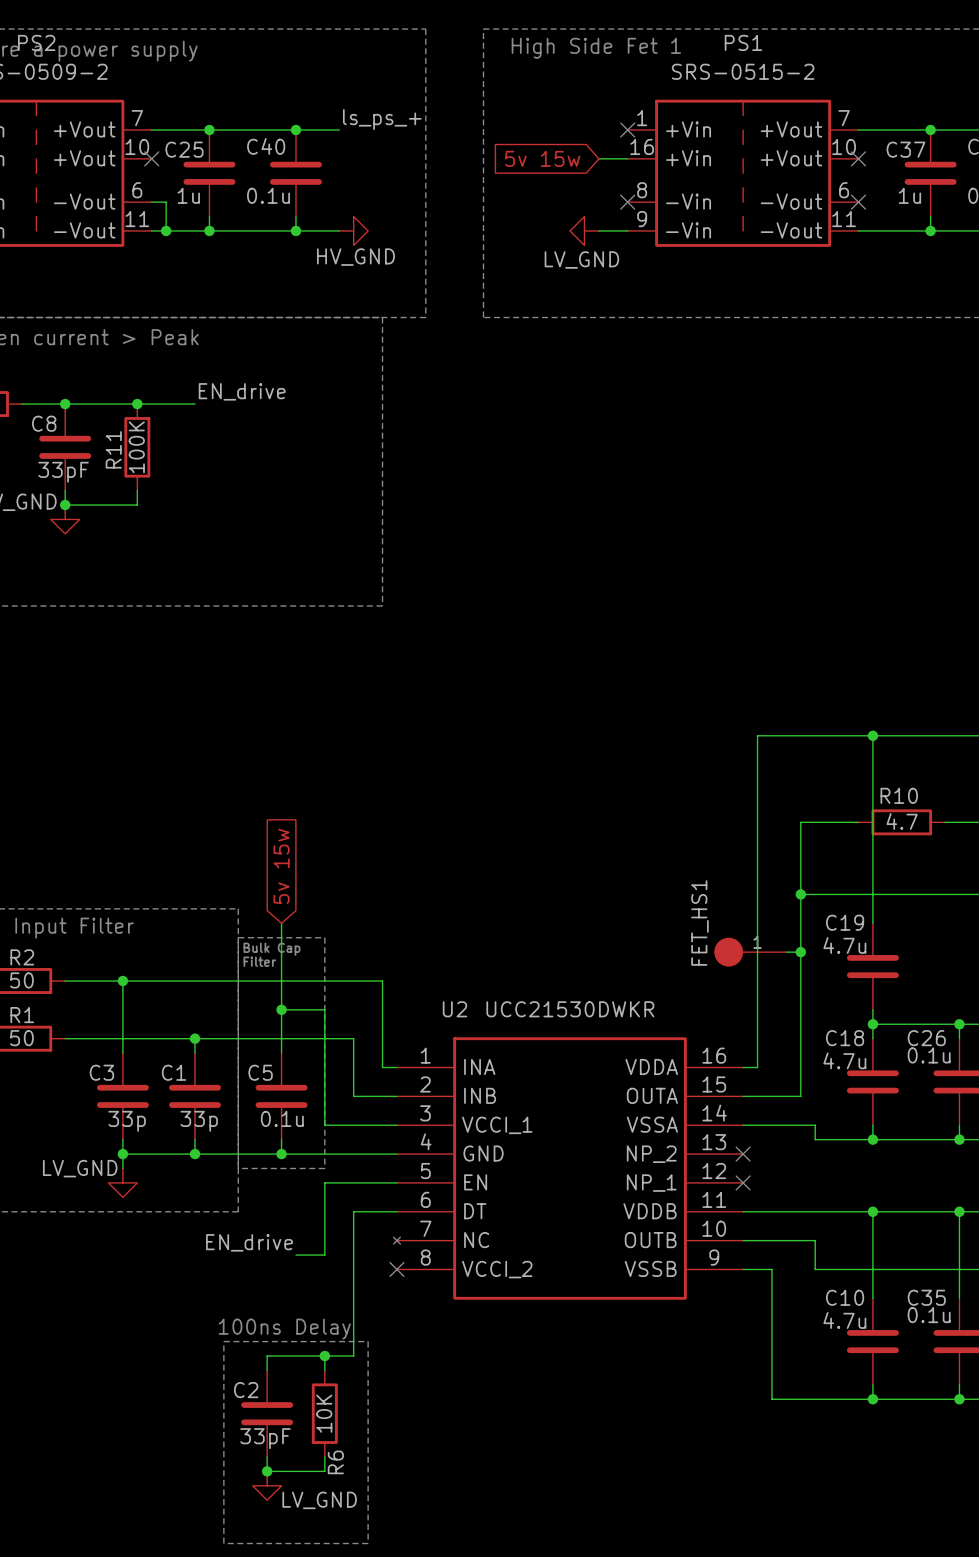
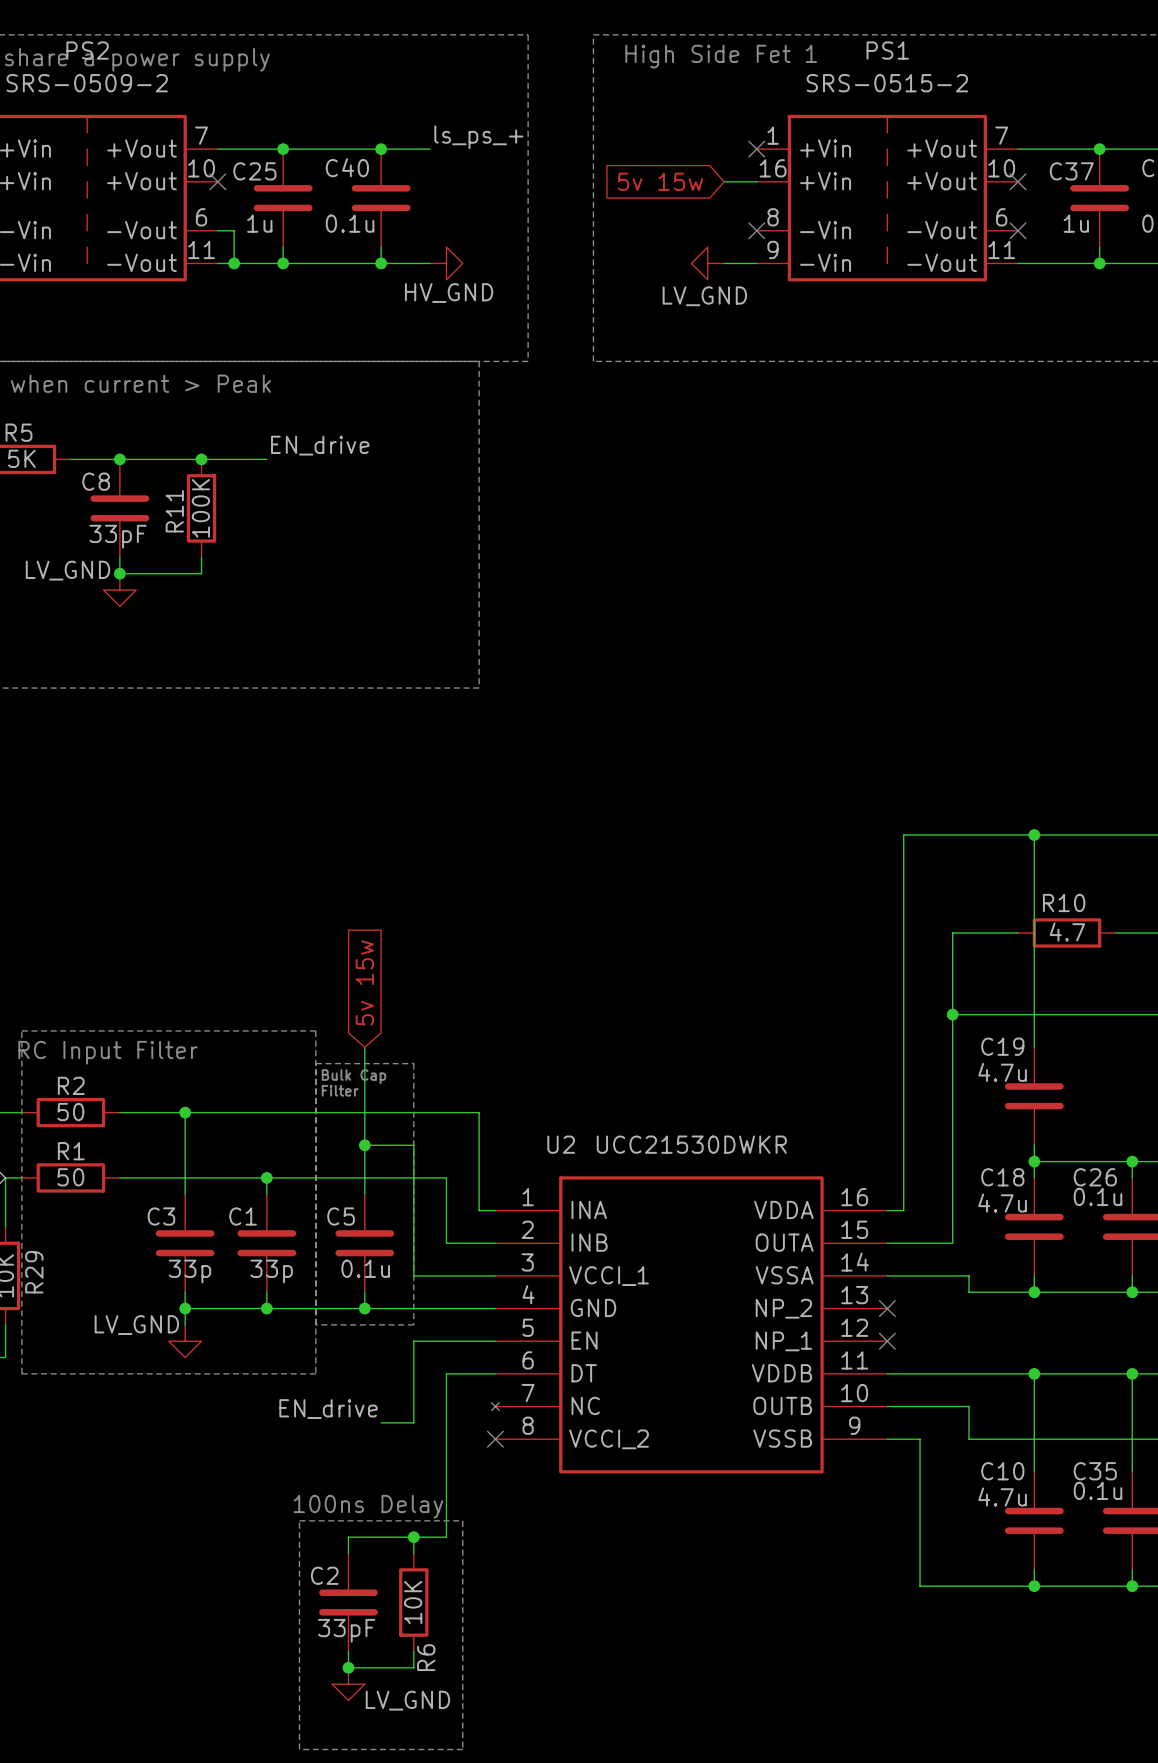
FET_HS1: (750, 952) -> none
wire: (786, 952) (800, 952) -> none
junction: (800, 952) -> none

